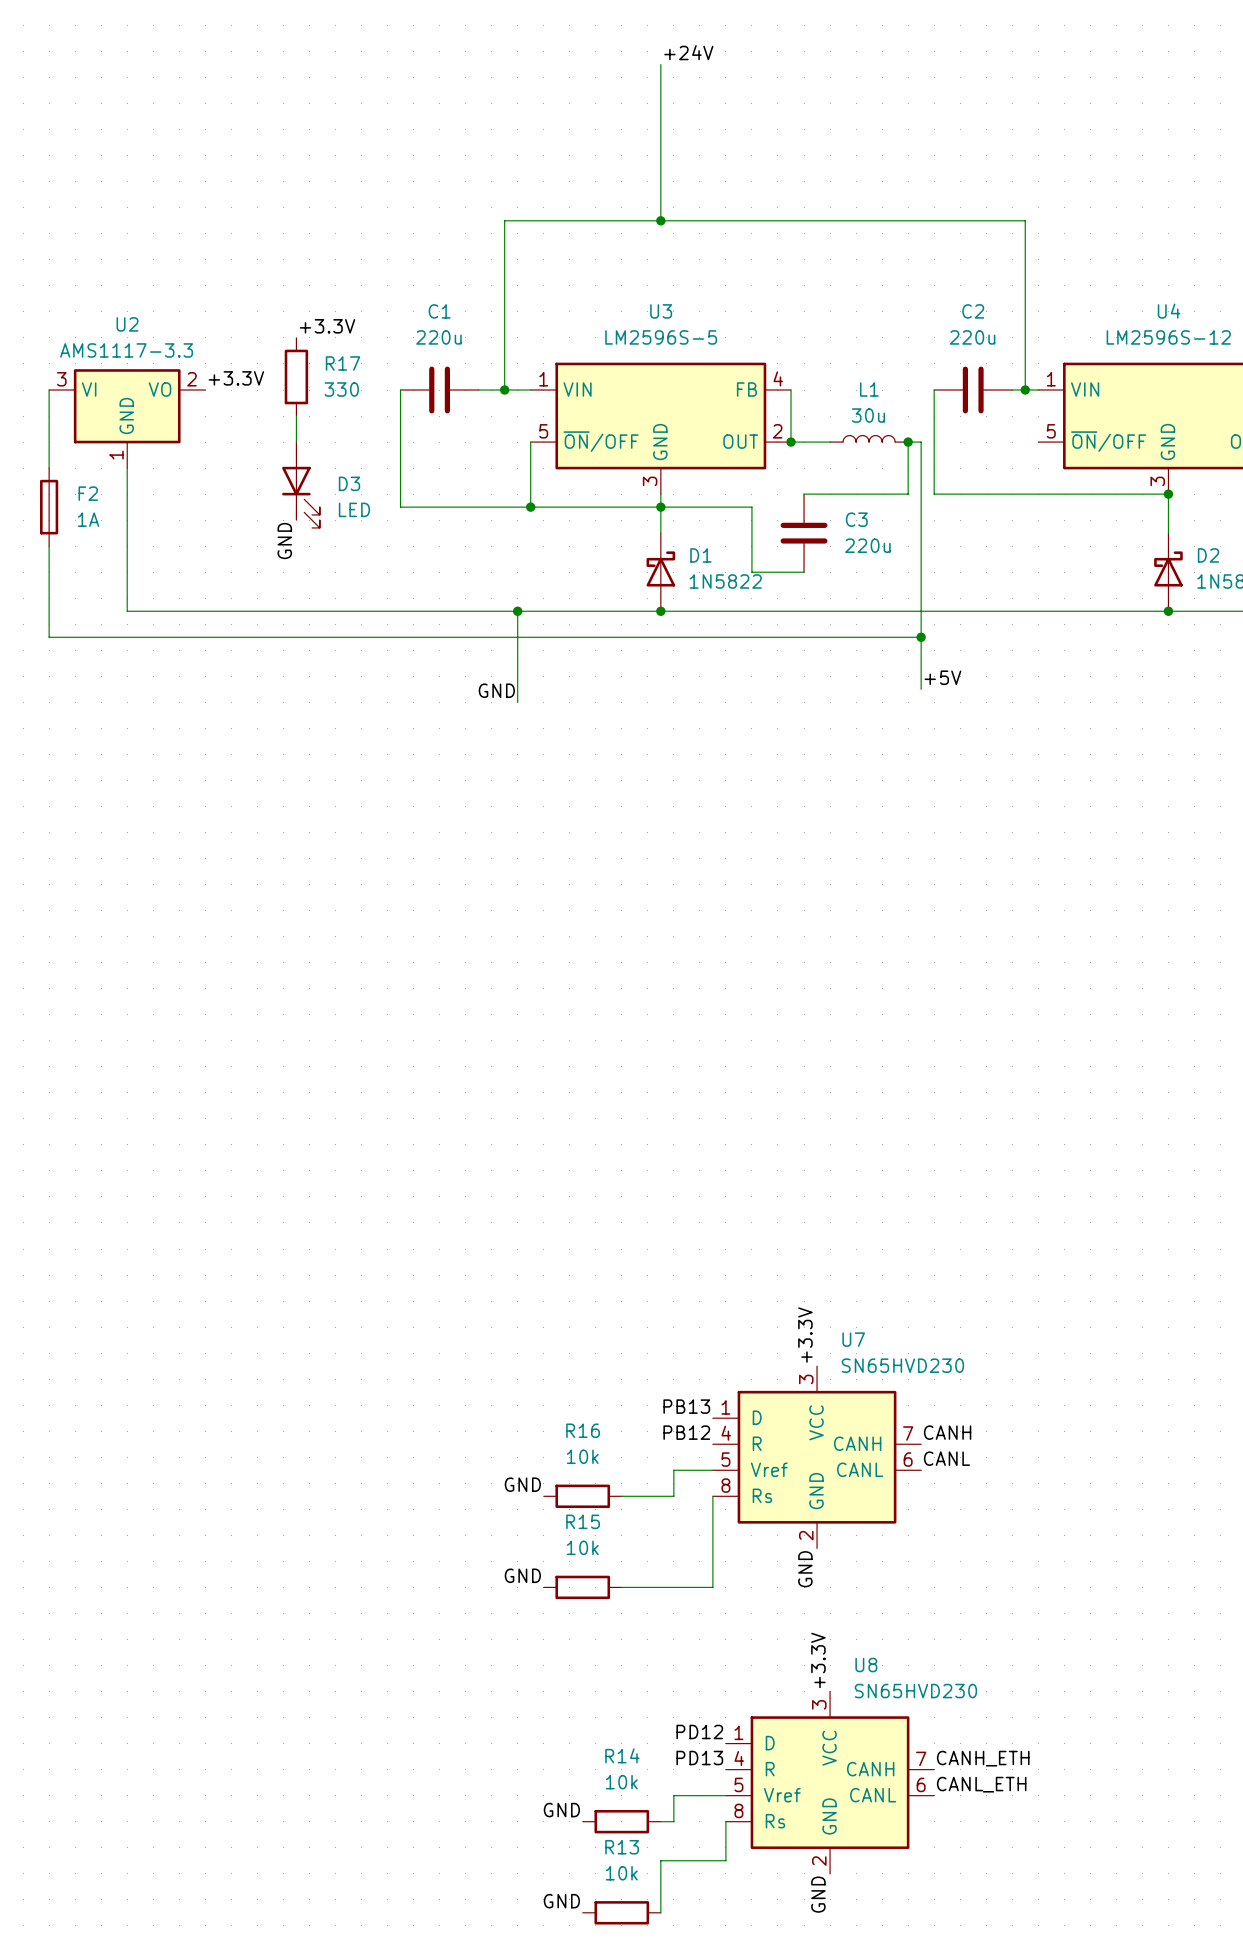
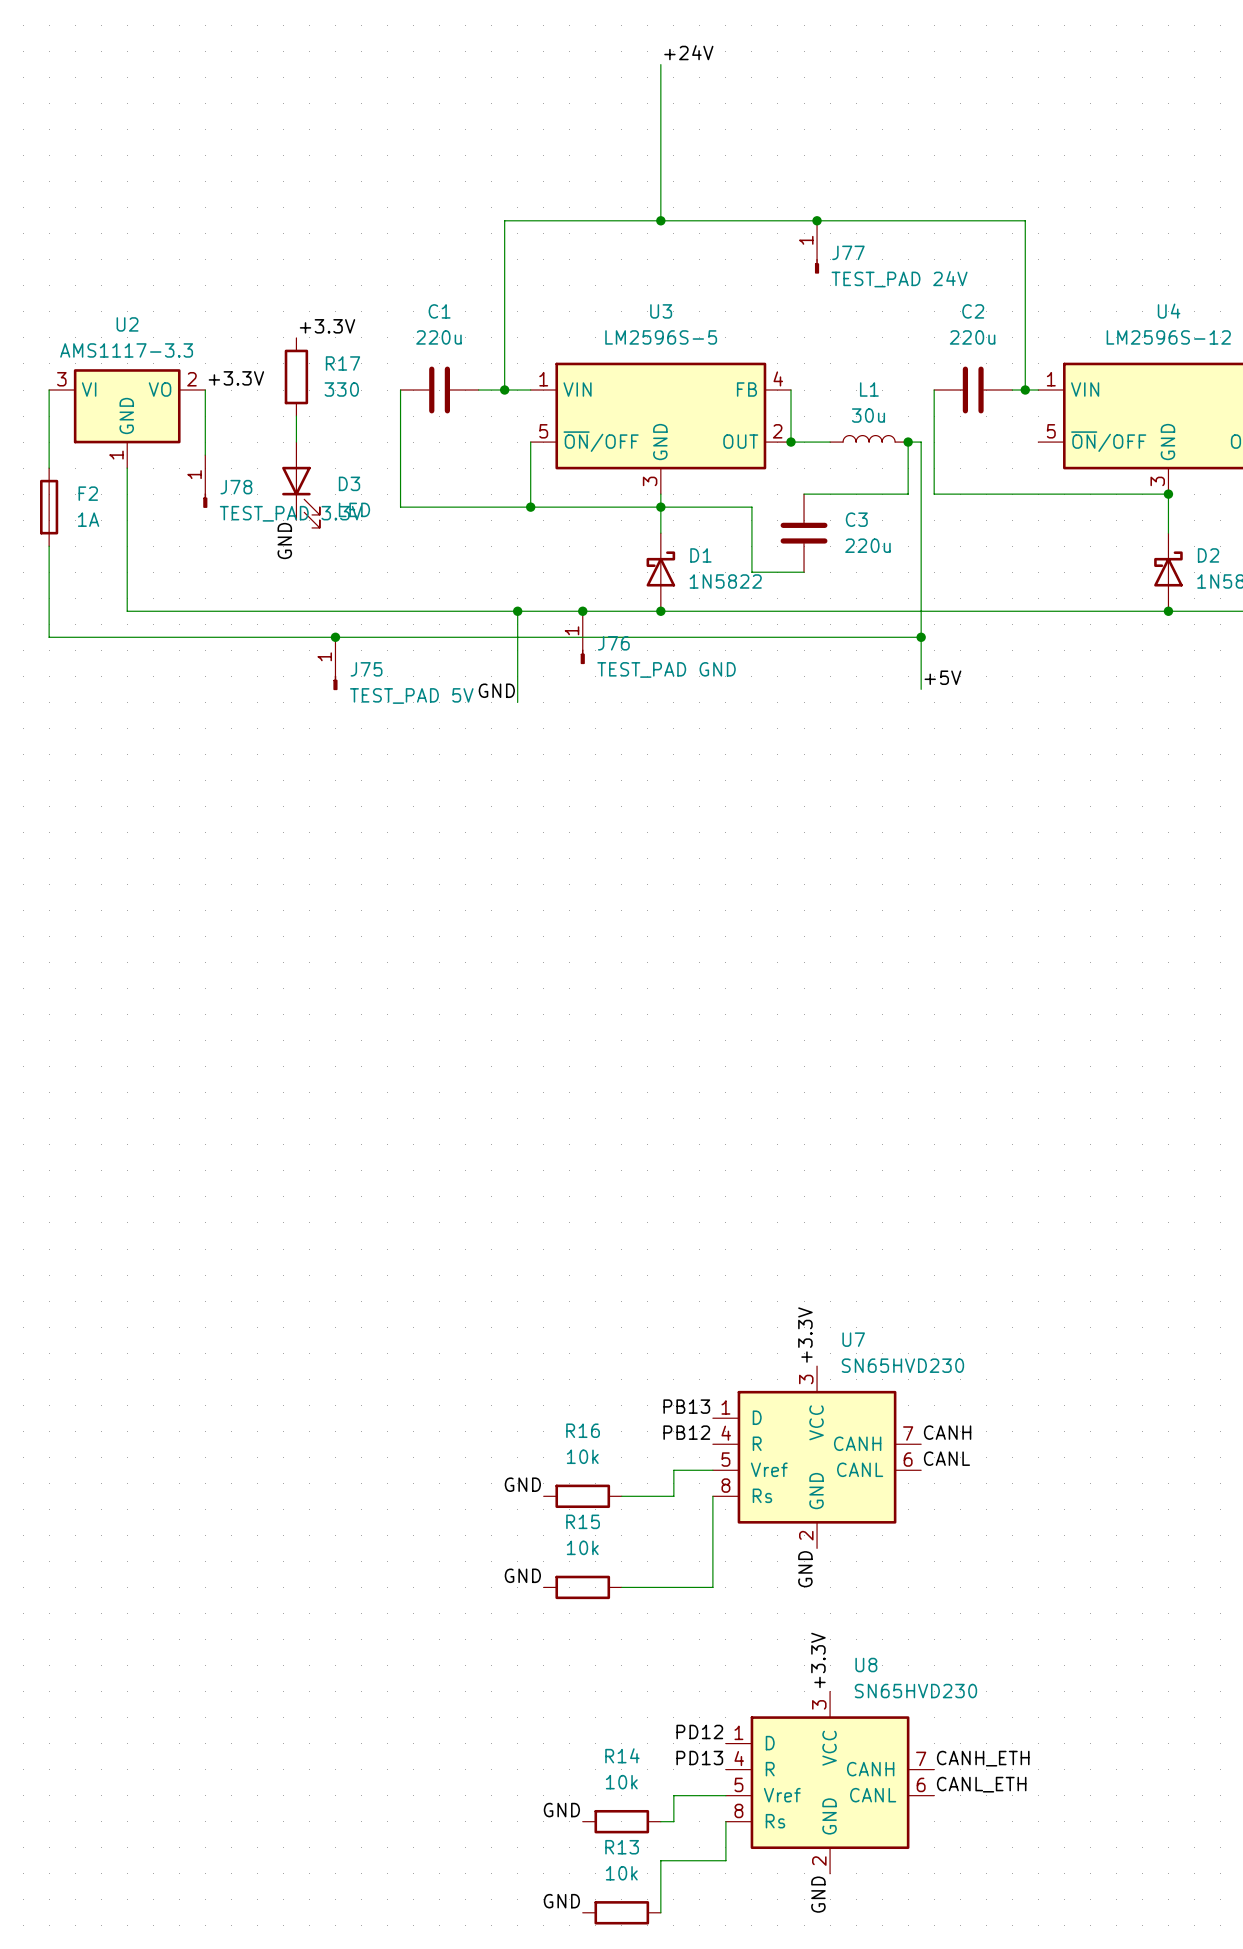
junction: none -> (817, 220)
J77: none -> TEST_PAD 24V (817, 247)
wire: none -> (205, 390) (205, 455)
J78: none -> TEST_PAD 3.3V (205, 481)
junction: none -> (582, 611)
junction: none -> (335, 637)
J76: none -> TEST_PAD GND (582, 637)
J75: none -> TEST_PAD 5V (335, 663)

